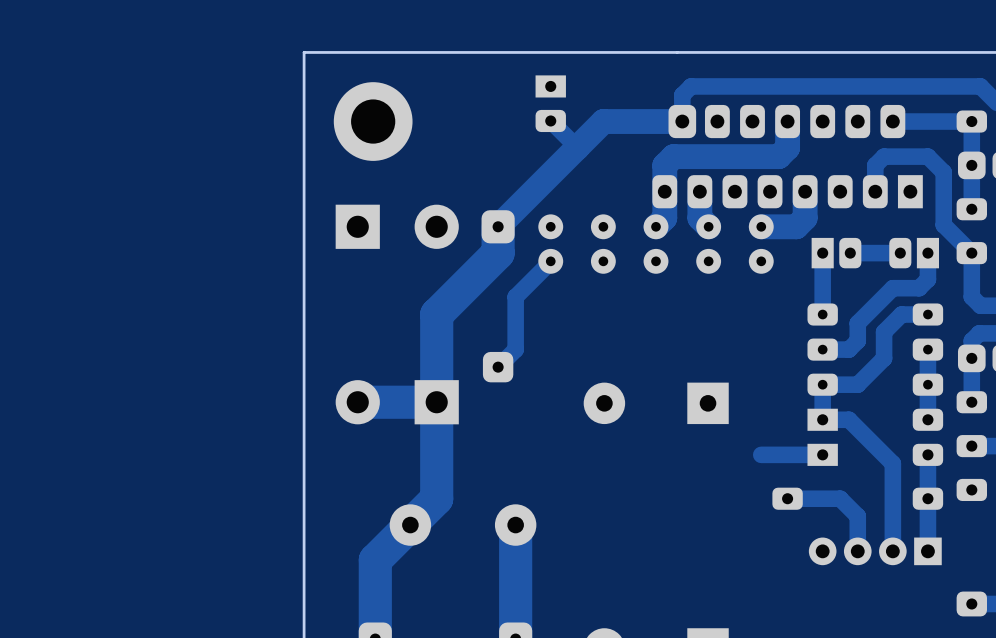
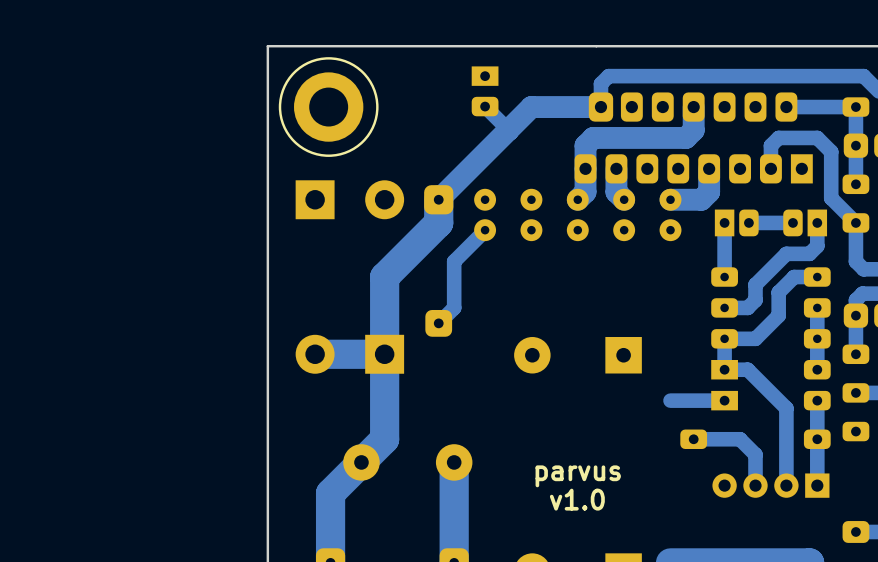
drawing: none -> [278, 57, 379, 157]
text: none -> parvus (578, 476)
text: none -> v1.0 (577, 499)

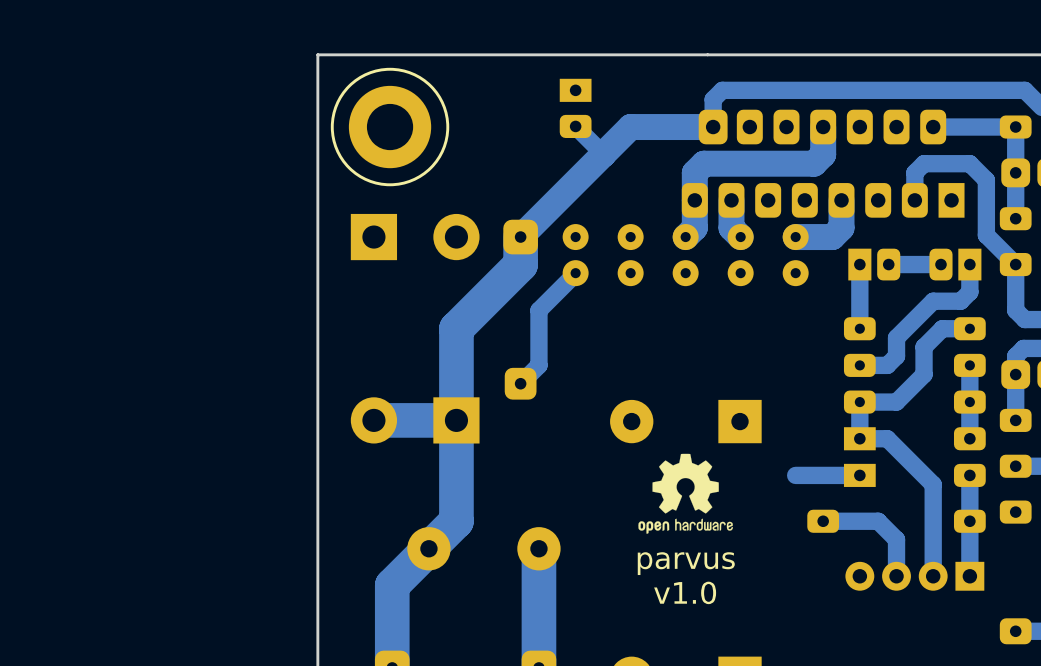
drawing: none -> [638, 453, 733, 534]

